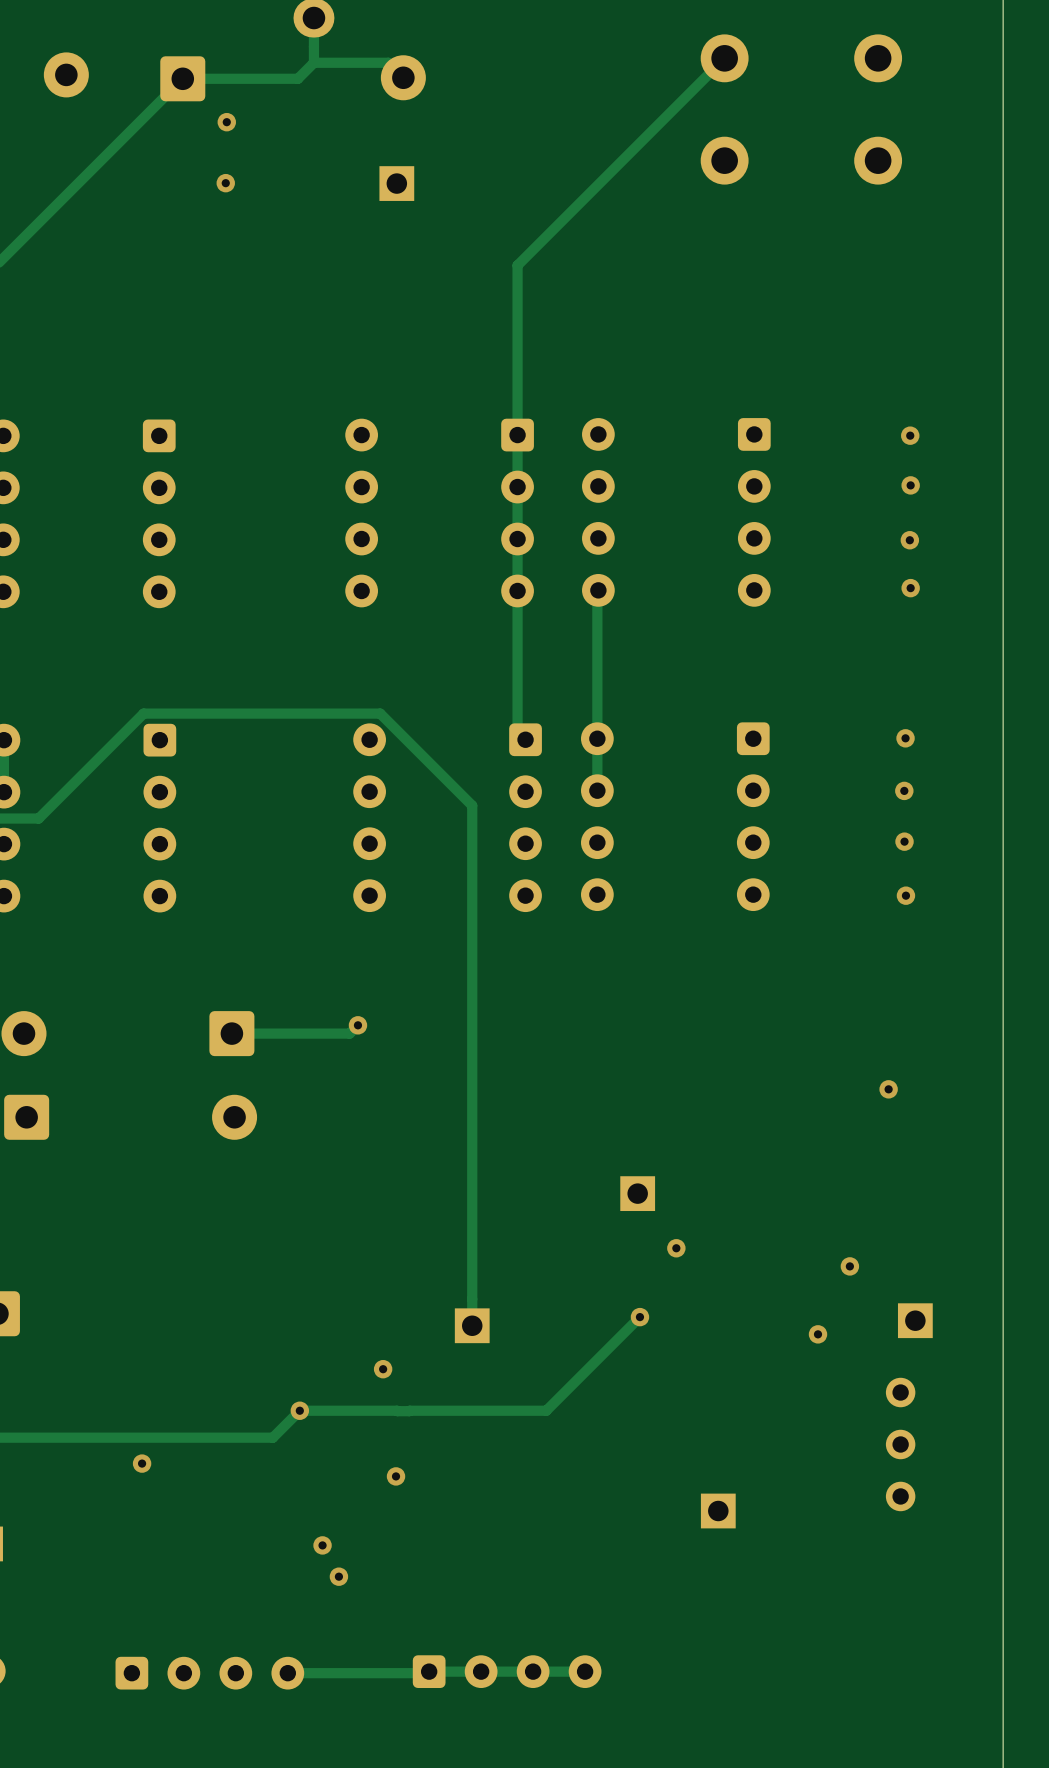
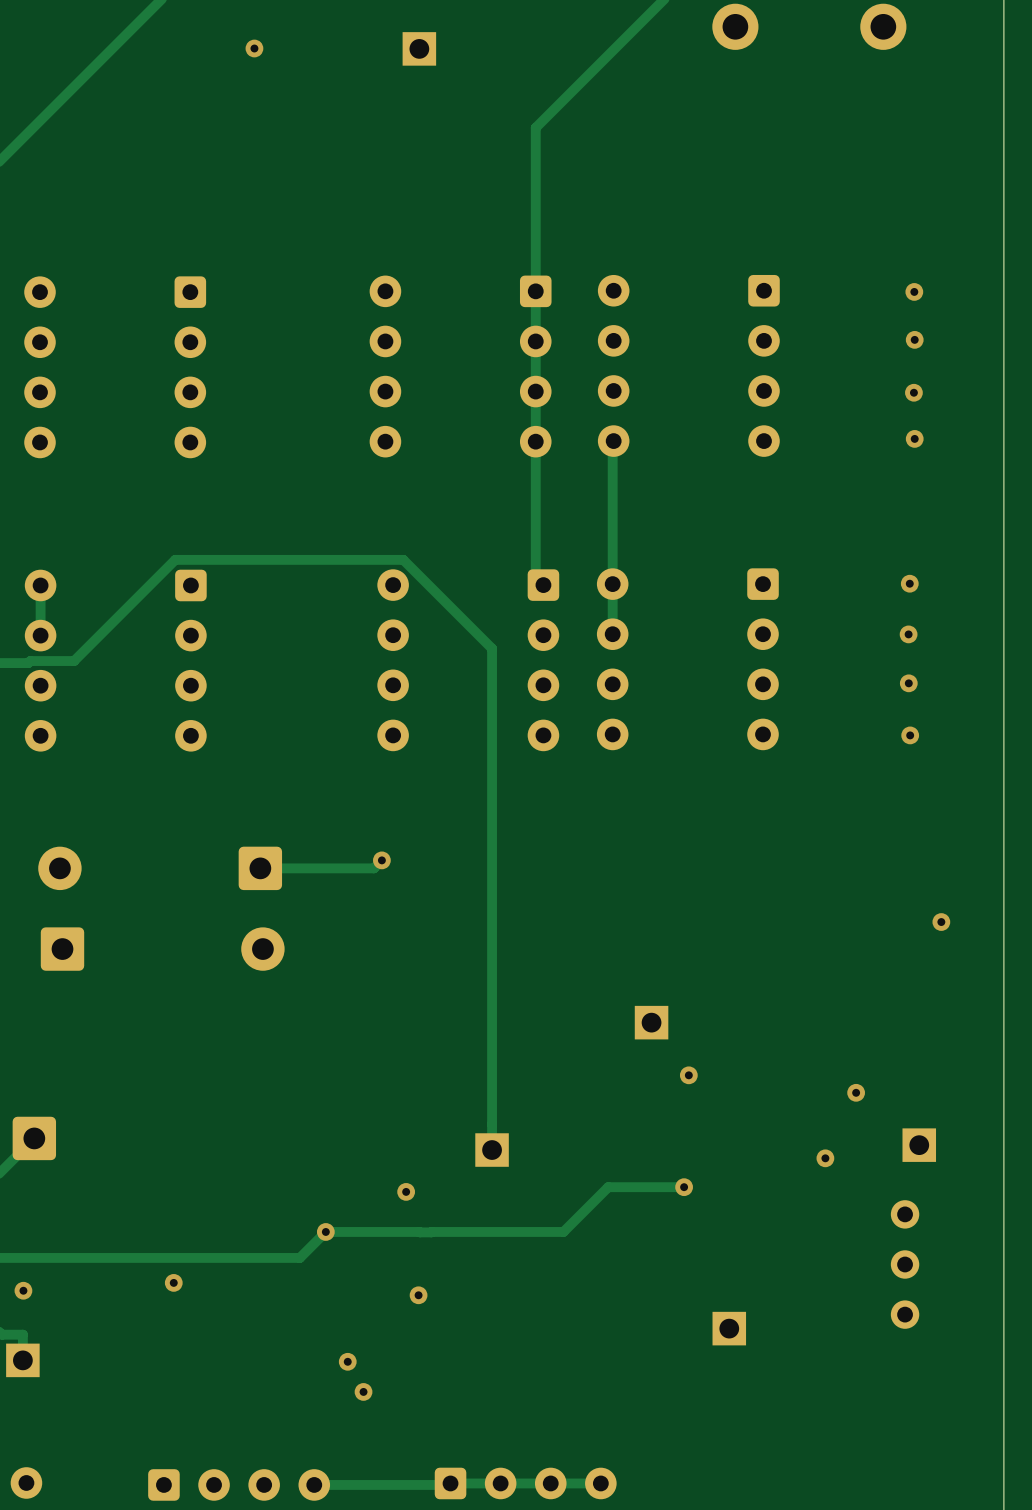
via position: (888, 1089) -> (941, 922)
track: (639, 1317) (592, 1364) -> (684, 1187) (608, 1187)
via position: (639, 1317) -> (684, 1187)

